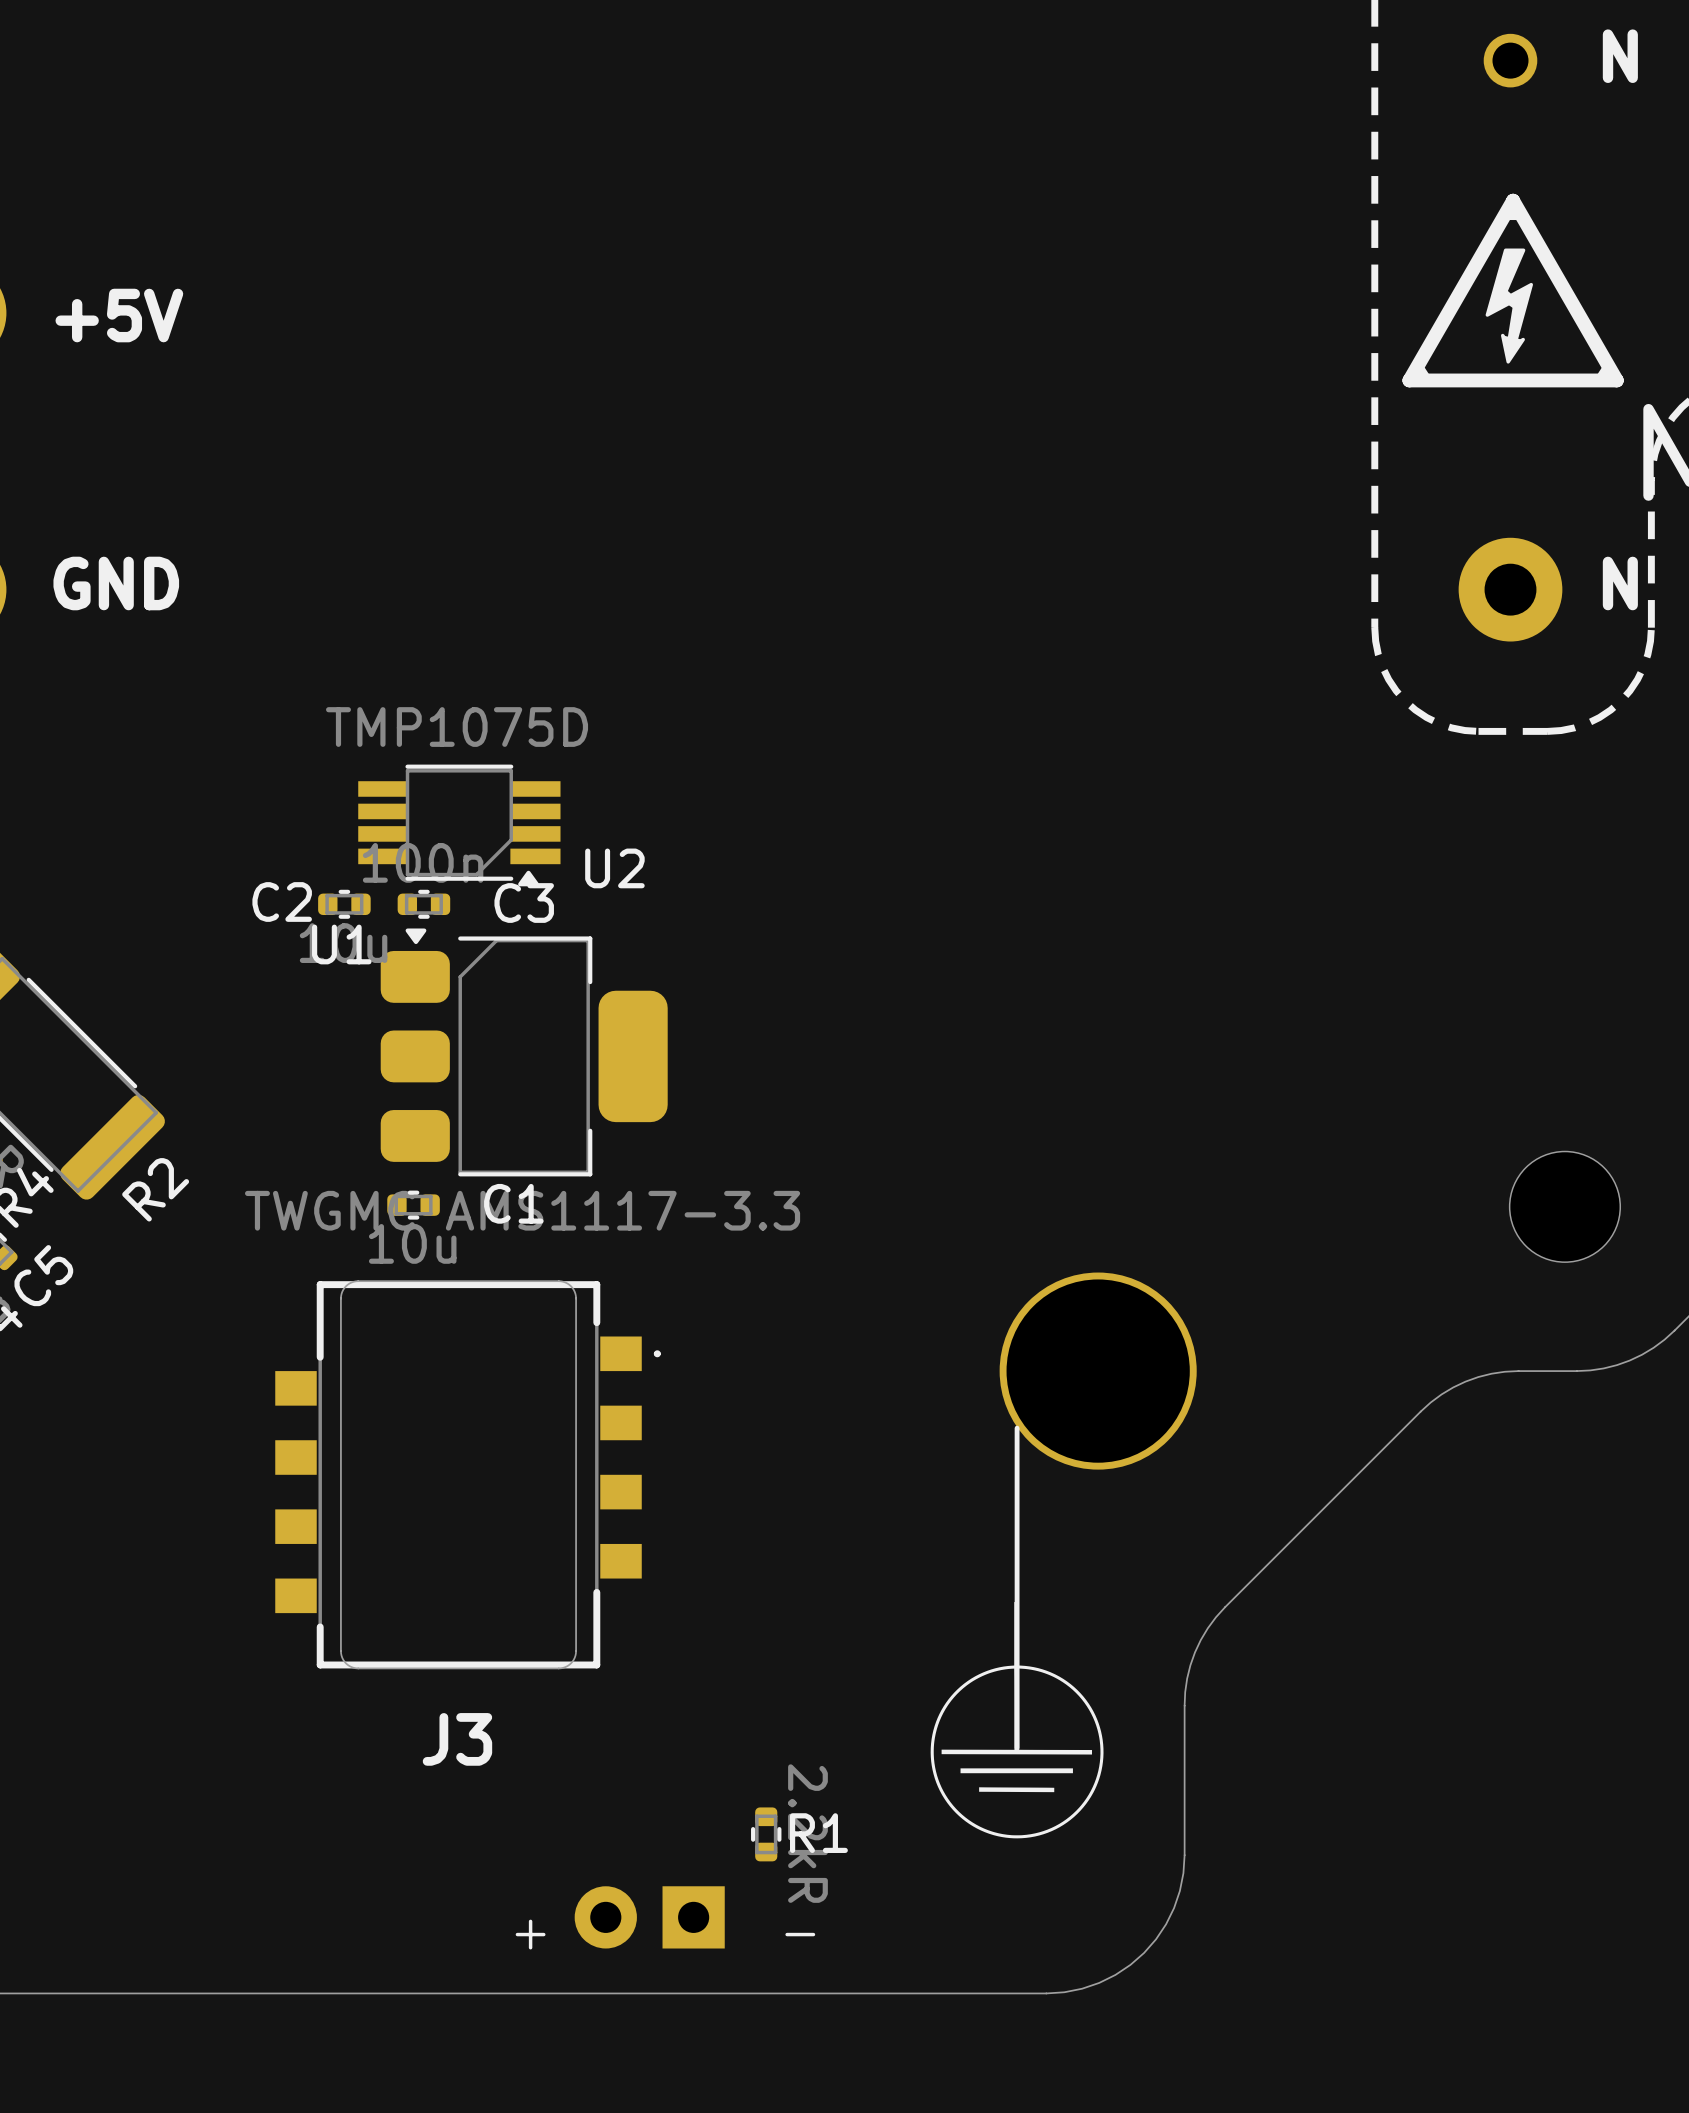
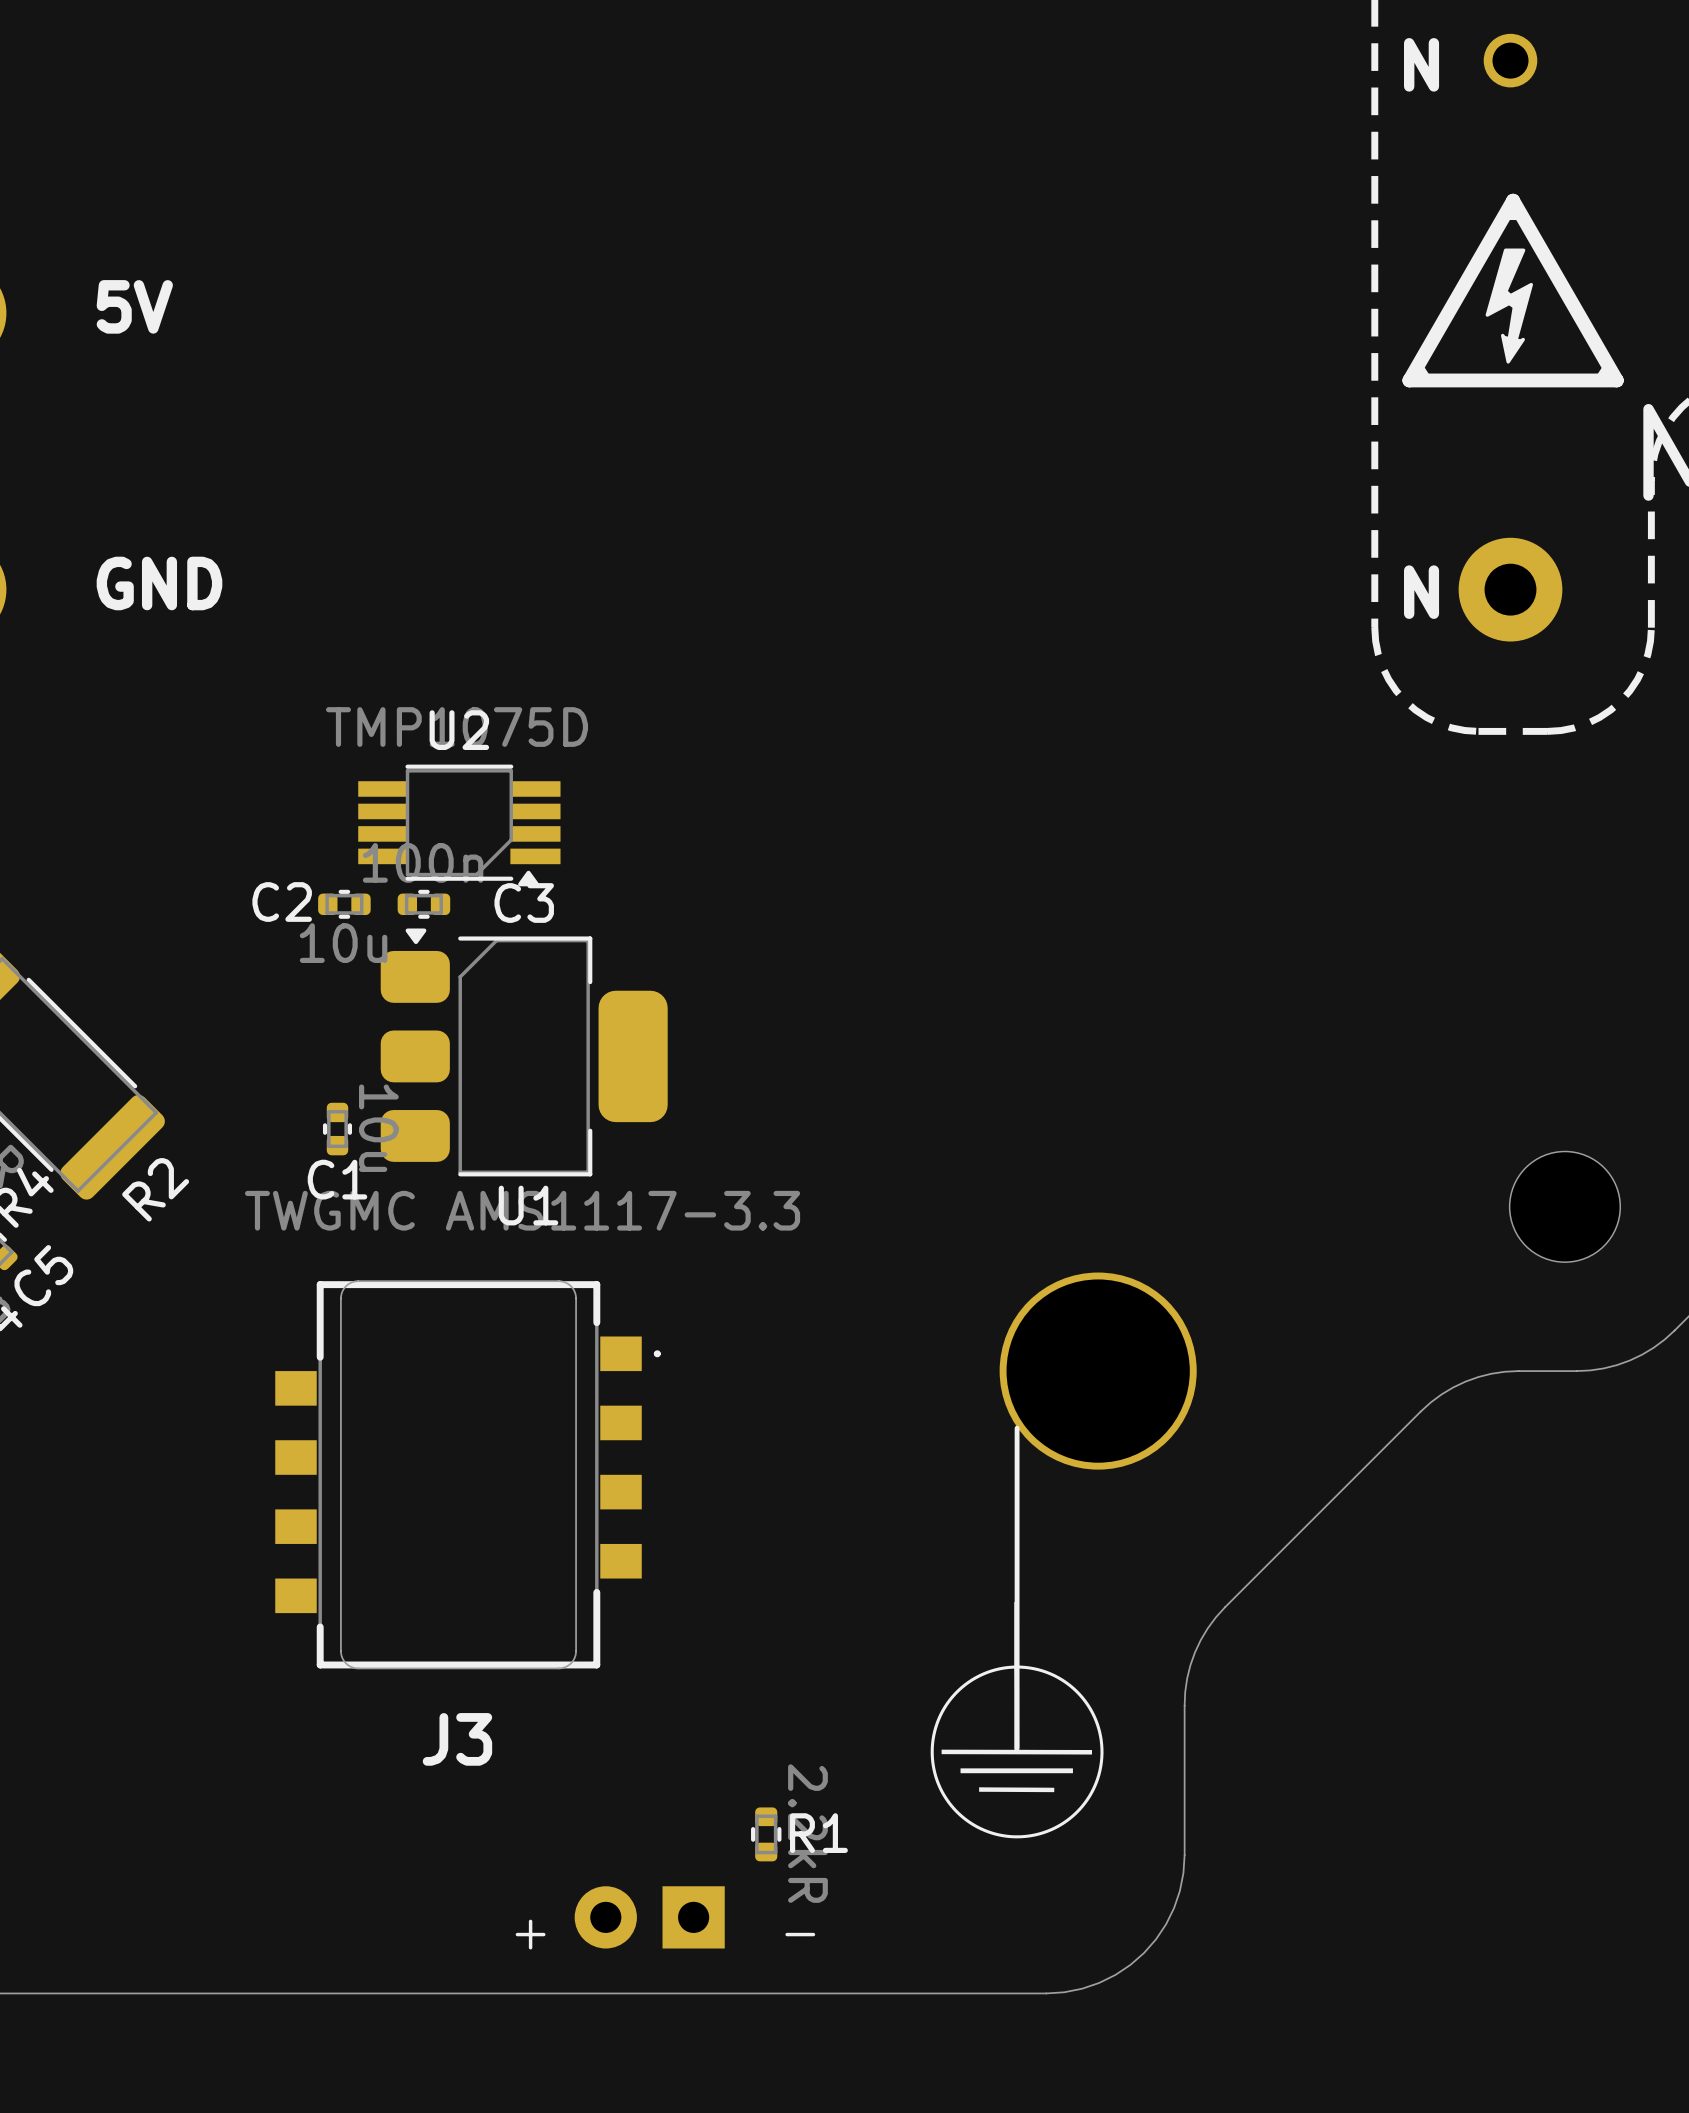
text position: N (1620, 56) -> N (1421, 64)
text: +5V (119, 315) -> 5V (134, 306)
text position: GND (116, 583) -> GND (159, 583)
text position: N (1620, 583) -> N (1421, 592)
U2 name position: U2 (614, 868) -> U2 (459, 730)
U1 name position: U1 (341, 944) -> U1 (528, 1205)
C1 rotation: 0° (413, 1205) -> 90° clockwise (337, 1129)
C1 position: (413, 1205) -> (337, 1129)

